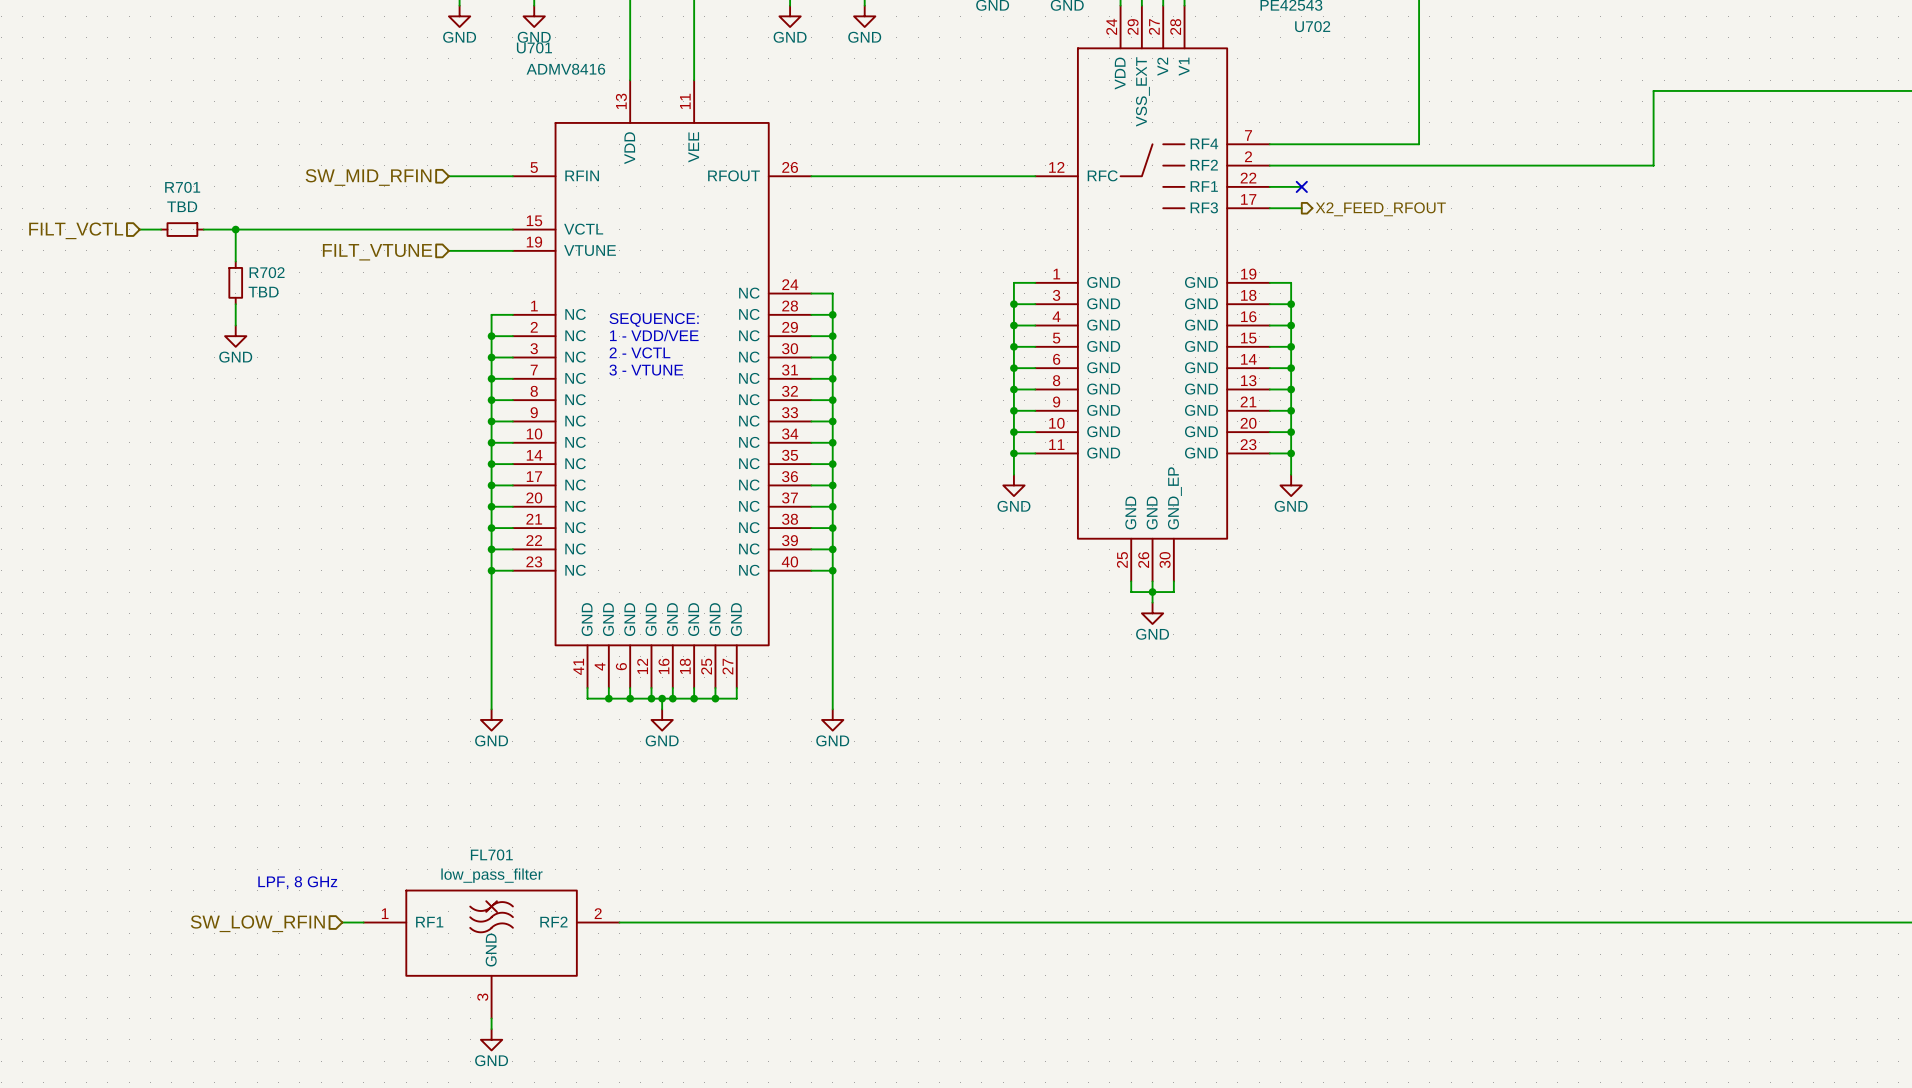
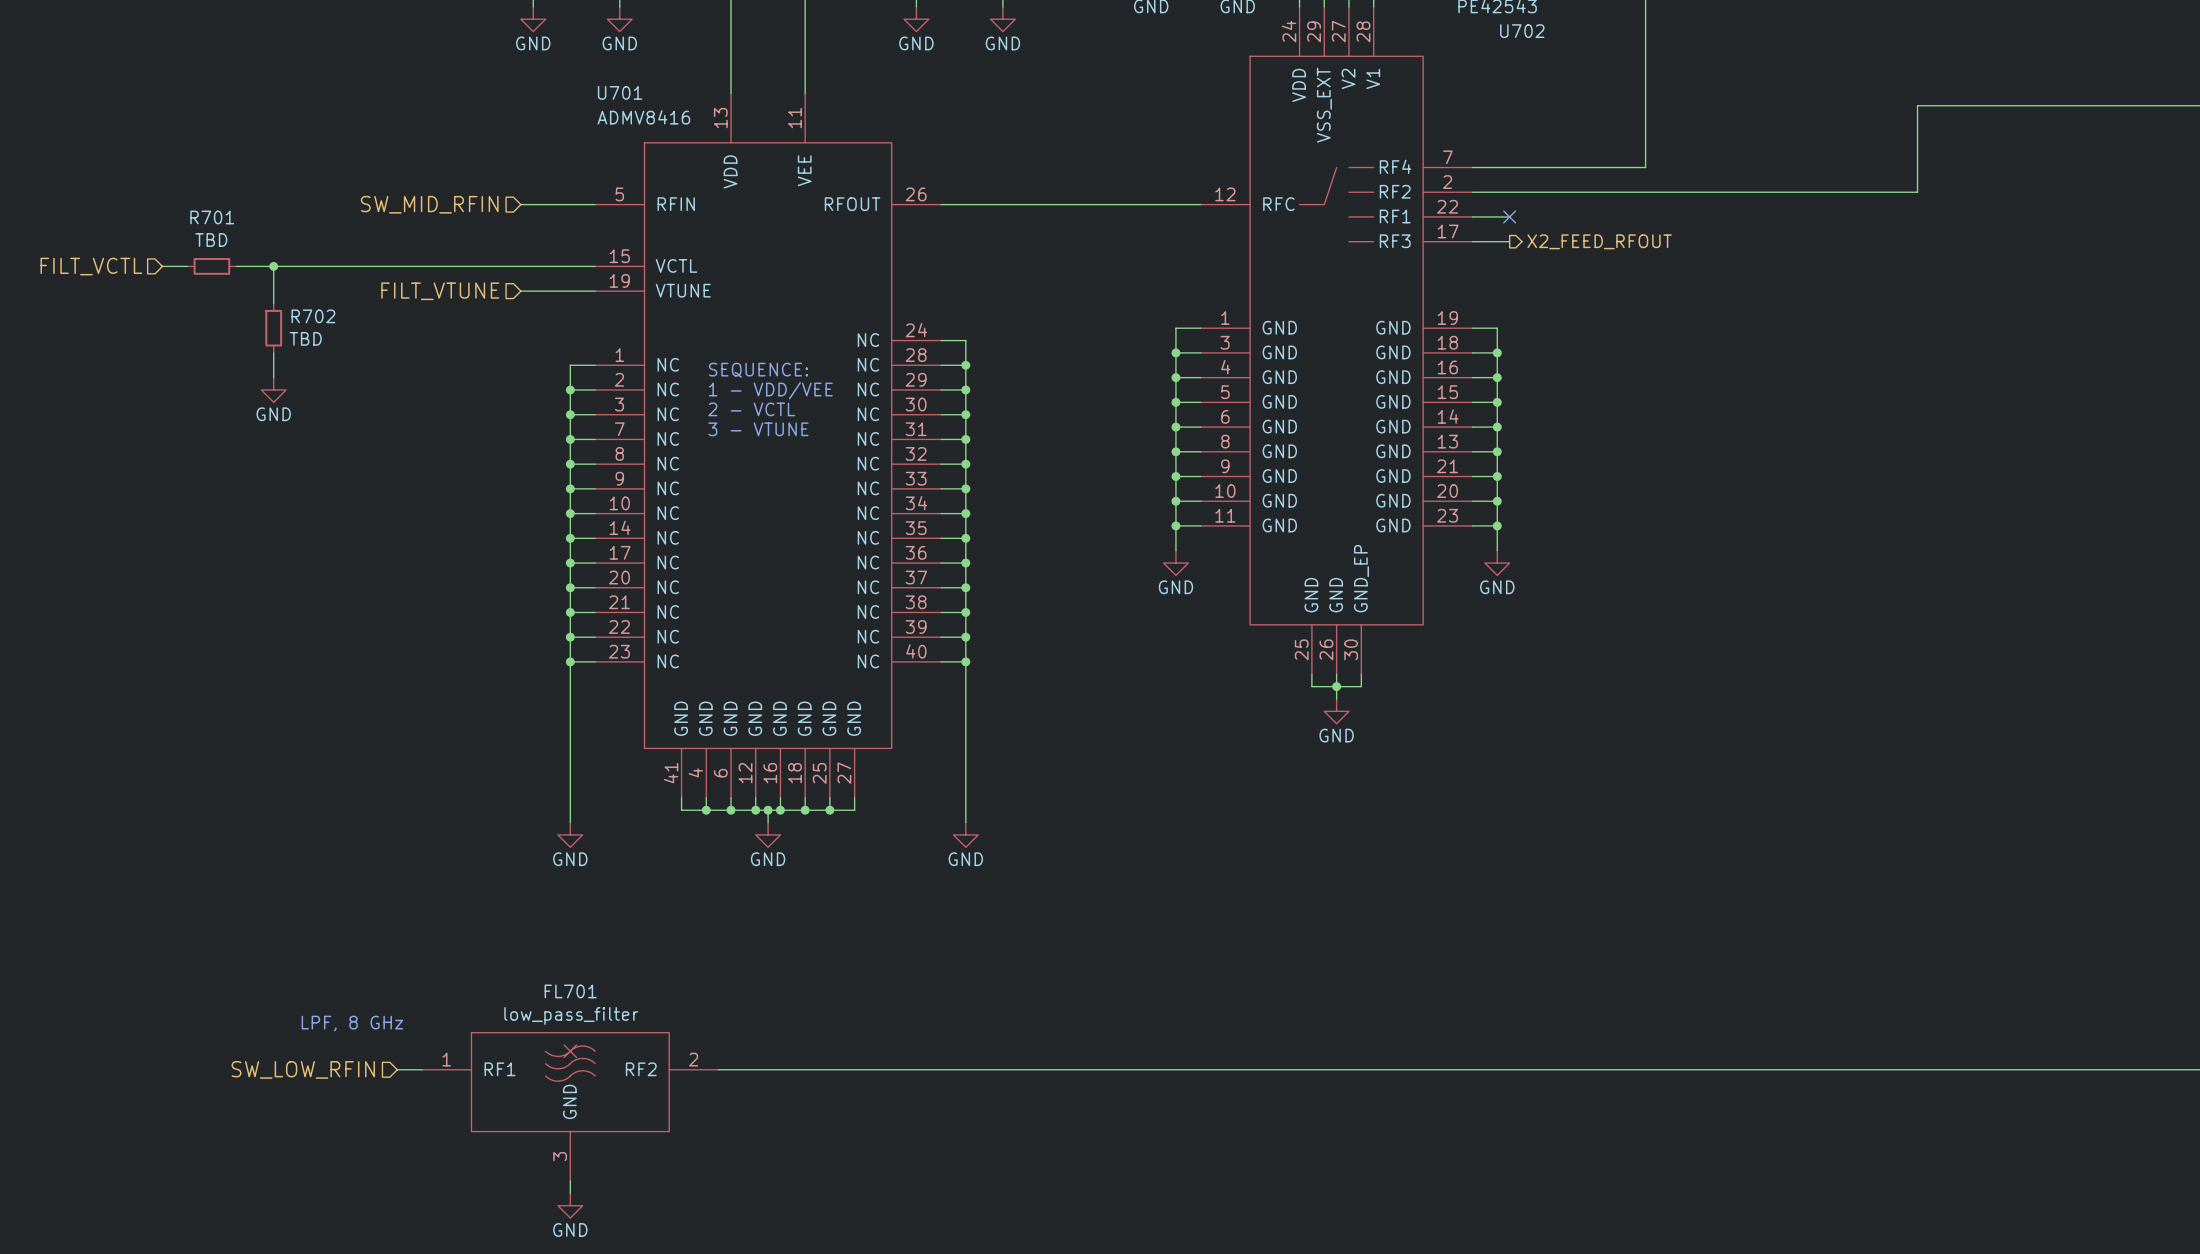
U701 name position: U701 (534, 47) -> U701 (620, 92)
U701 value position: ADMV8416 (565, 69) -> ADMV8416 (643, 117)

